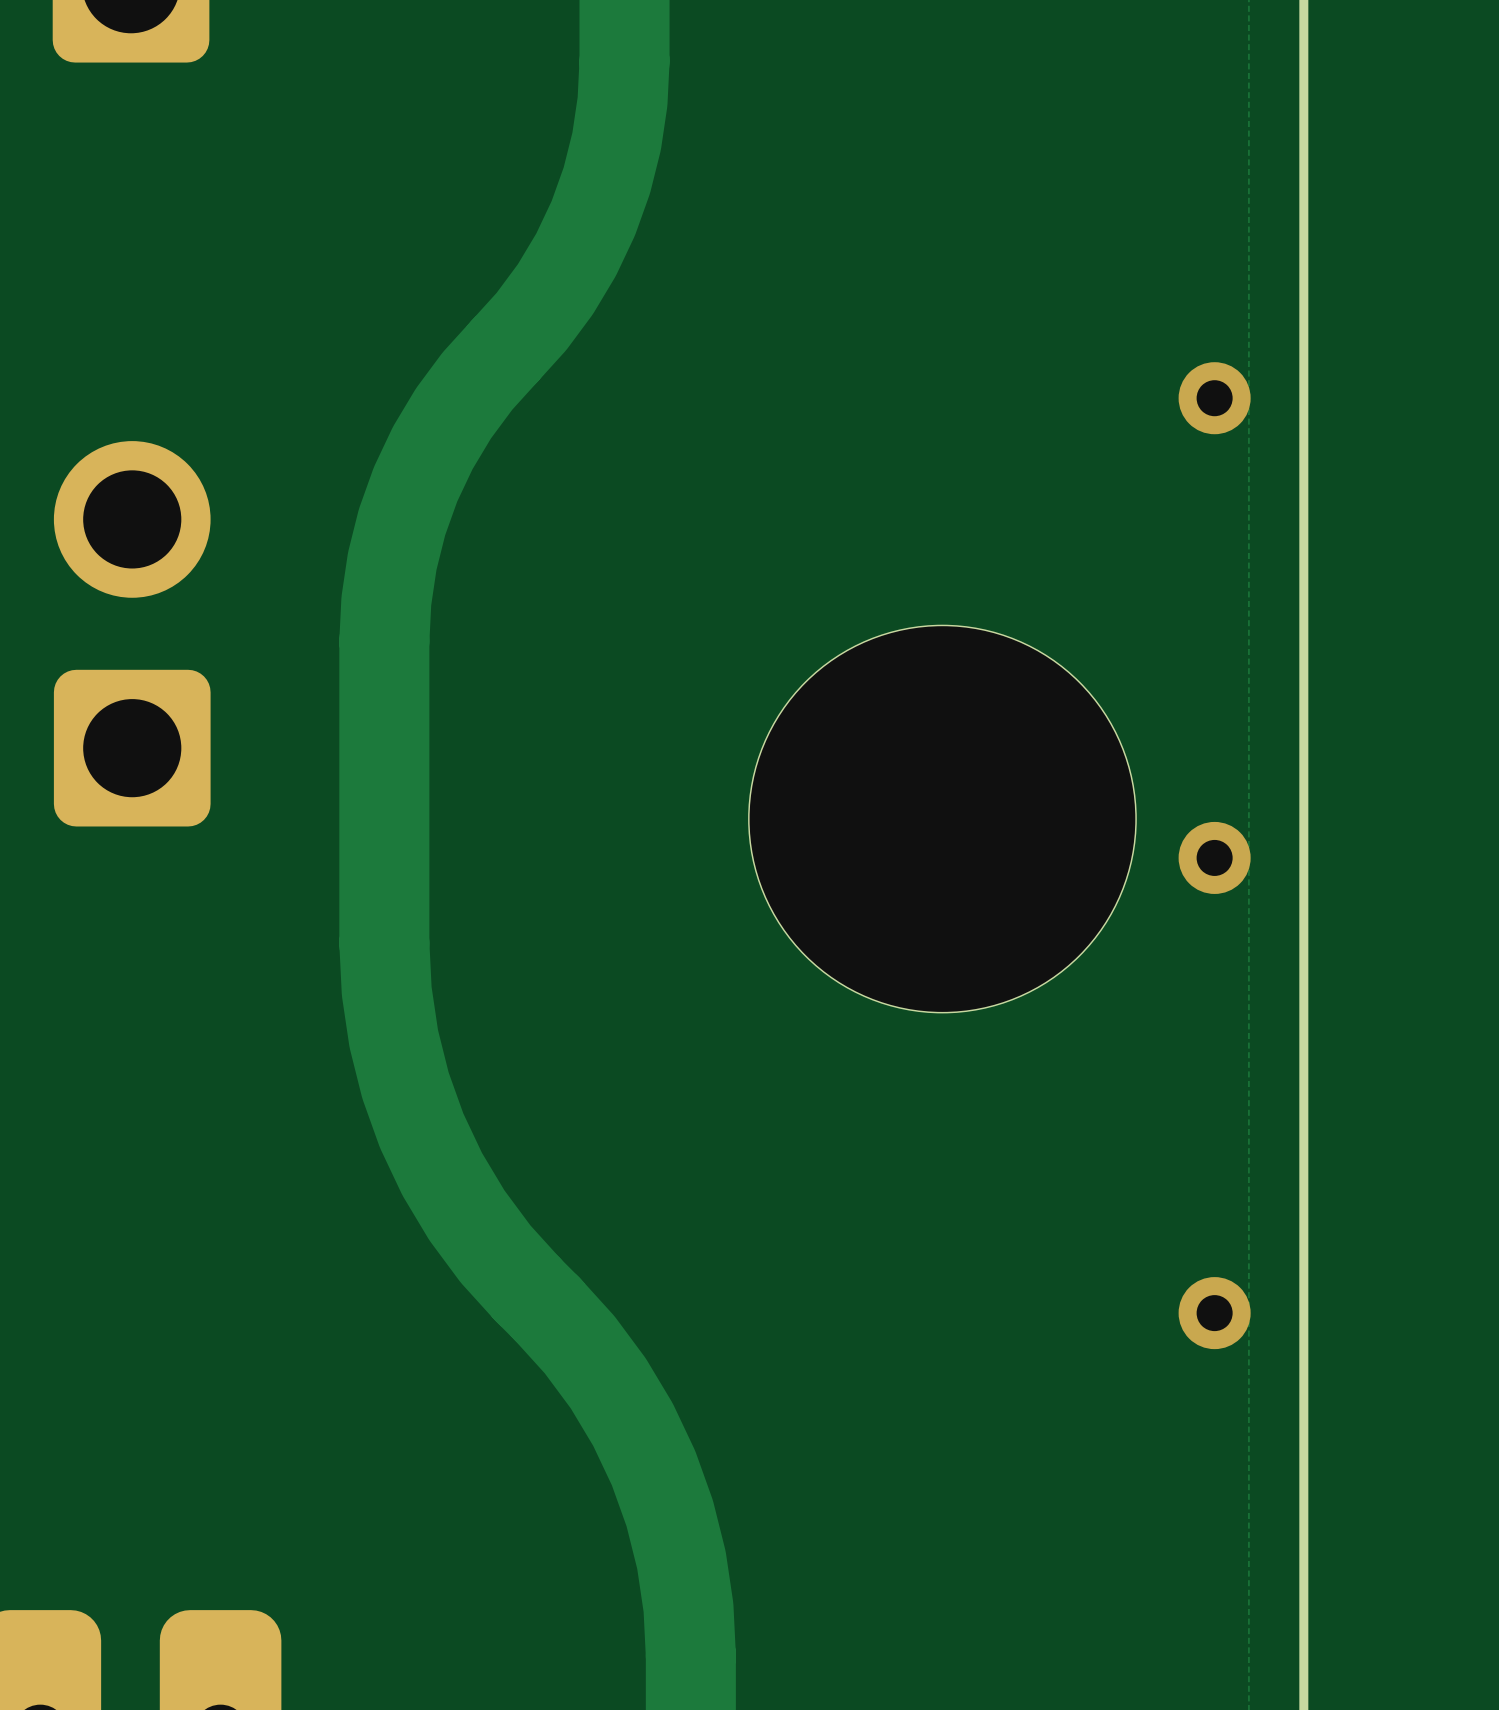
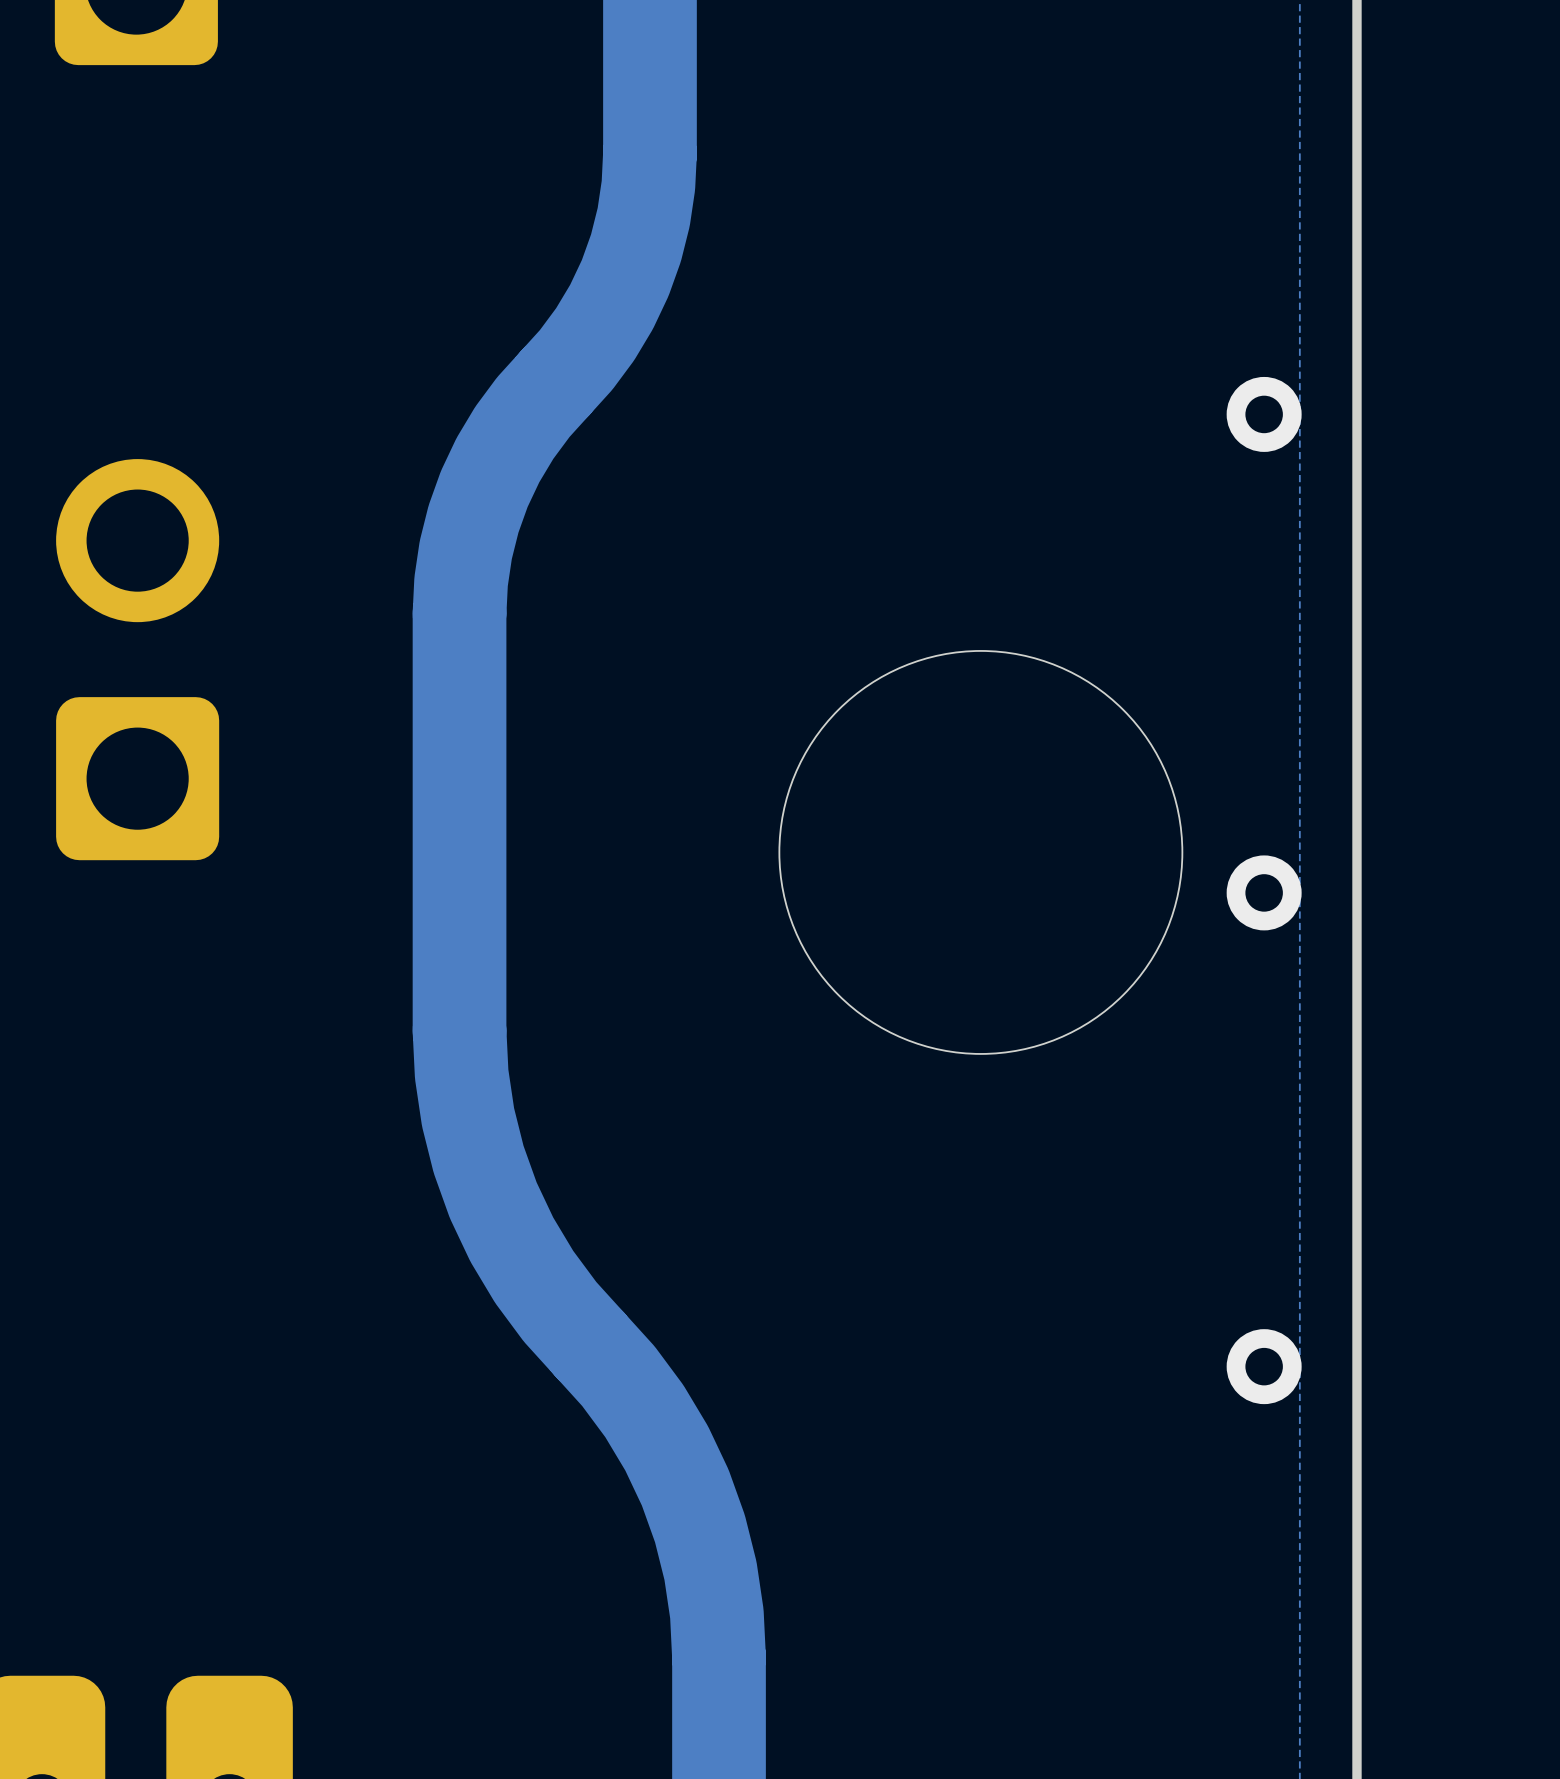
track: (624, 61) (622, 101) (616, 141) (606, 180) (593, 218) (576, 254) (555, 289) (531, 321) (477, 381) (453, 413) (432, 447) (415, 484) (402, 522) (392, 561) (386, 601) (384, 641) (384, 943) (386, 991) (393, 1038) (405, 1085) (421, 1130) (442, 1174) (466, 1215) (495, 1254) (579, 1344) (608, 1383) (632, 1424) (653, 1468) (669, 1513) (681, 1560) (688, 1607) (690, 1655) -> (649, 63) (648, 185) (643, 217) (635, 247) (625, 278) (611, 306) (595, 334) (576, 359) (533, 407) (514, 432) (497, 460) (484, 488) (473, 519) (465, 549) (461, 581) (459, 613) (459, 1030) (461, 1074) (468, 1117) (478, 1159) (493, 1200) (511, 1239) (534, 1276) (560, 1311) (618, 1376) (644, 1411) (666, 1448) (685, 1487) (699, 1528) (710, 1570) (716, 1613) (719, 1723)

